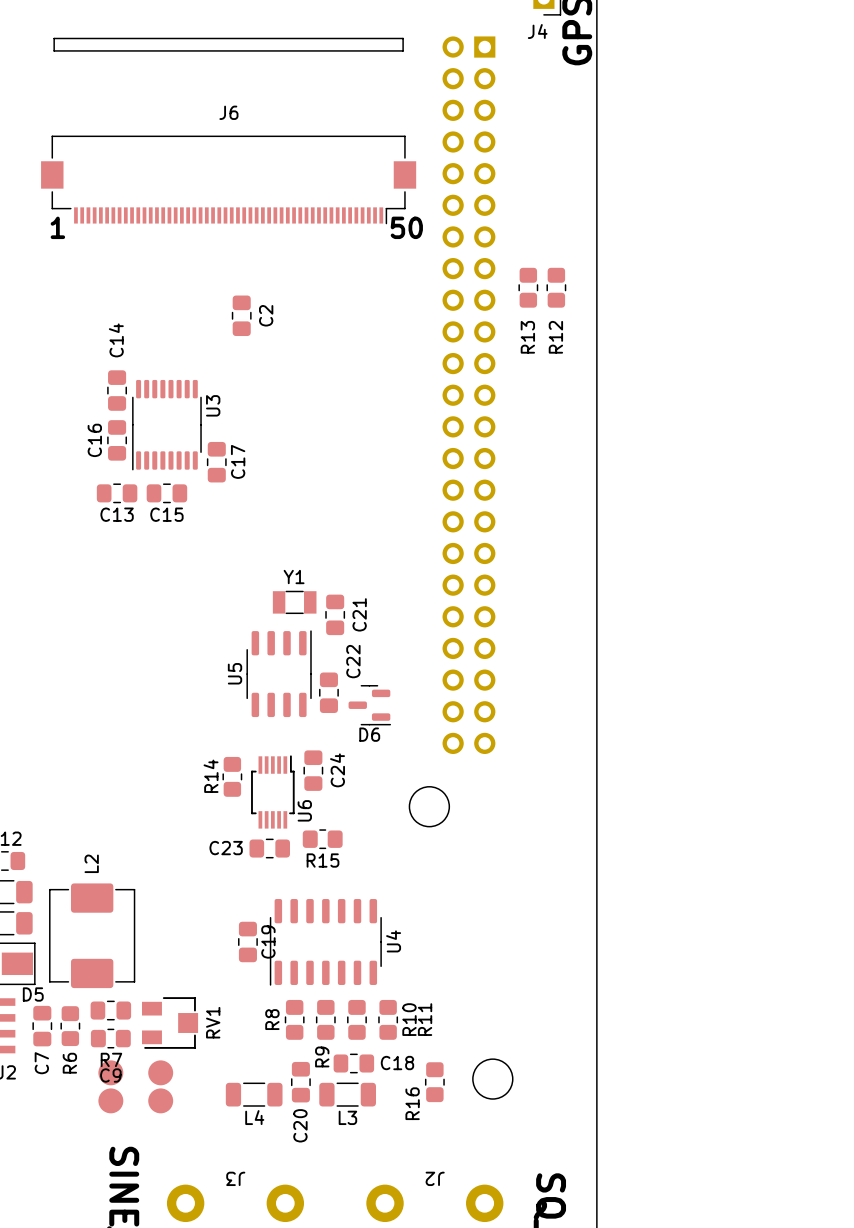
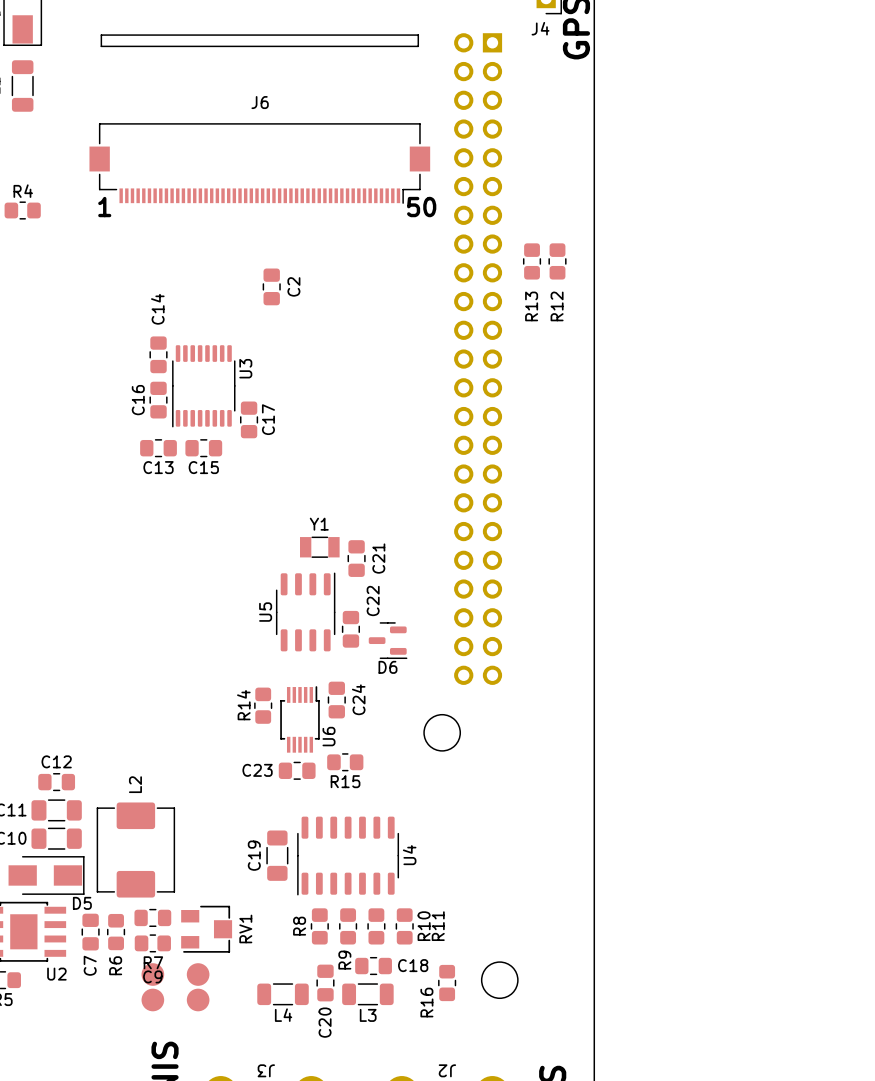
C19 footprint: [238, 921, 258, 963] -> [266, 830, 289, 881]
C19 name position: C19 (268, 941) -> C19 (254, 855)

